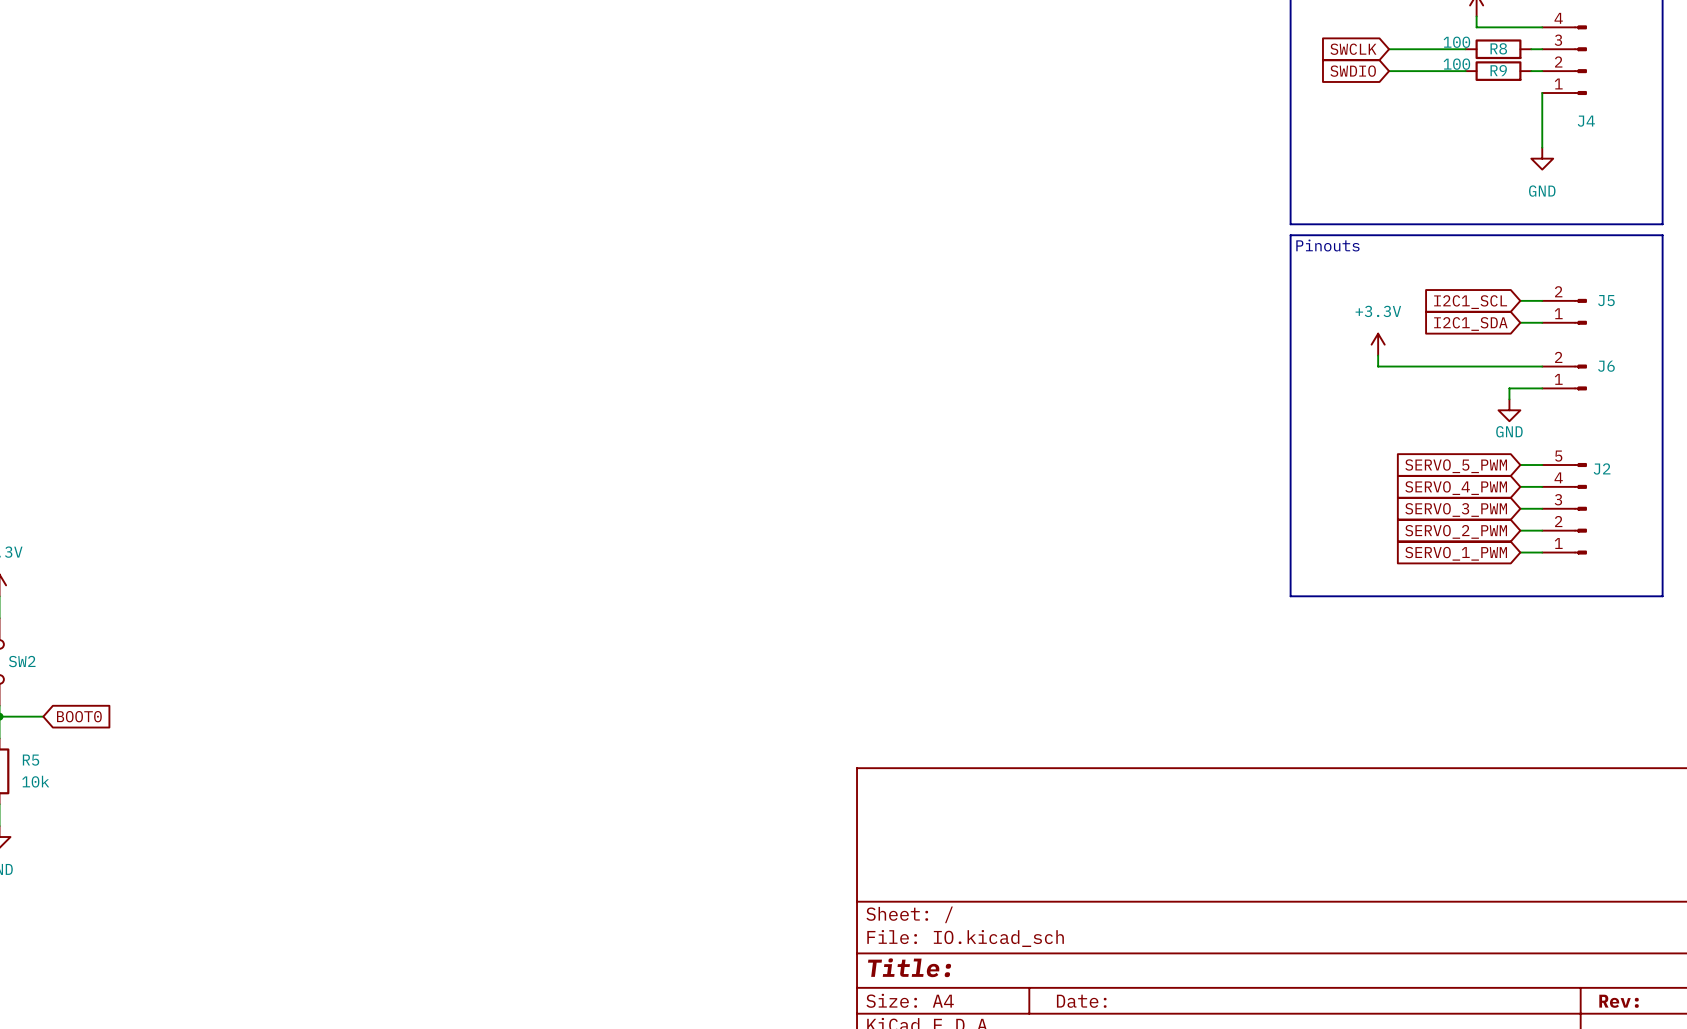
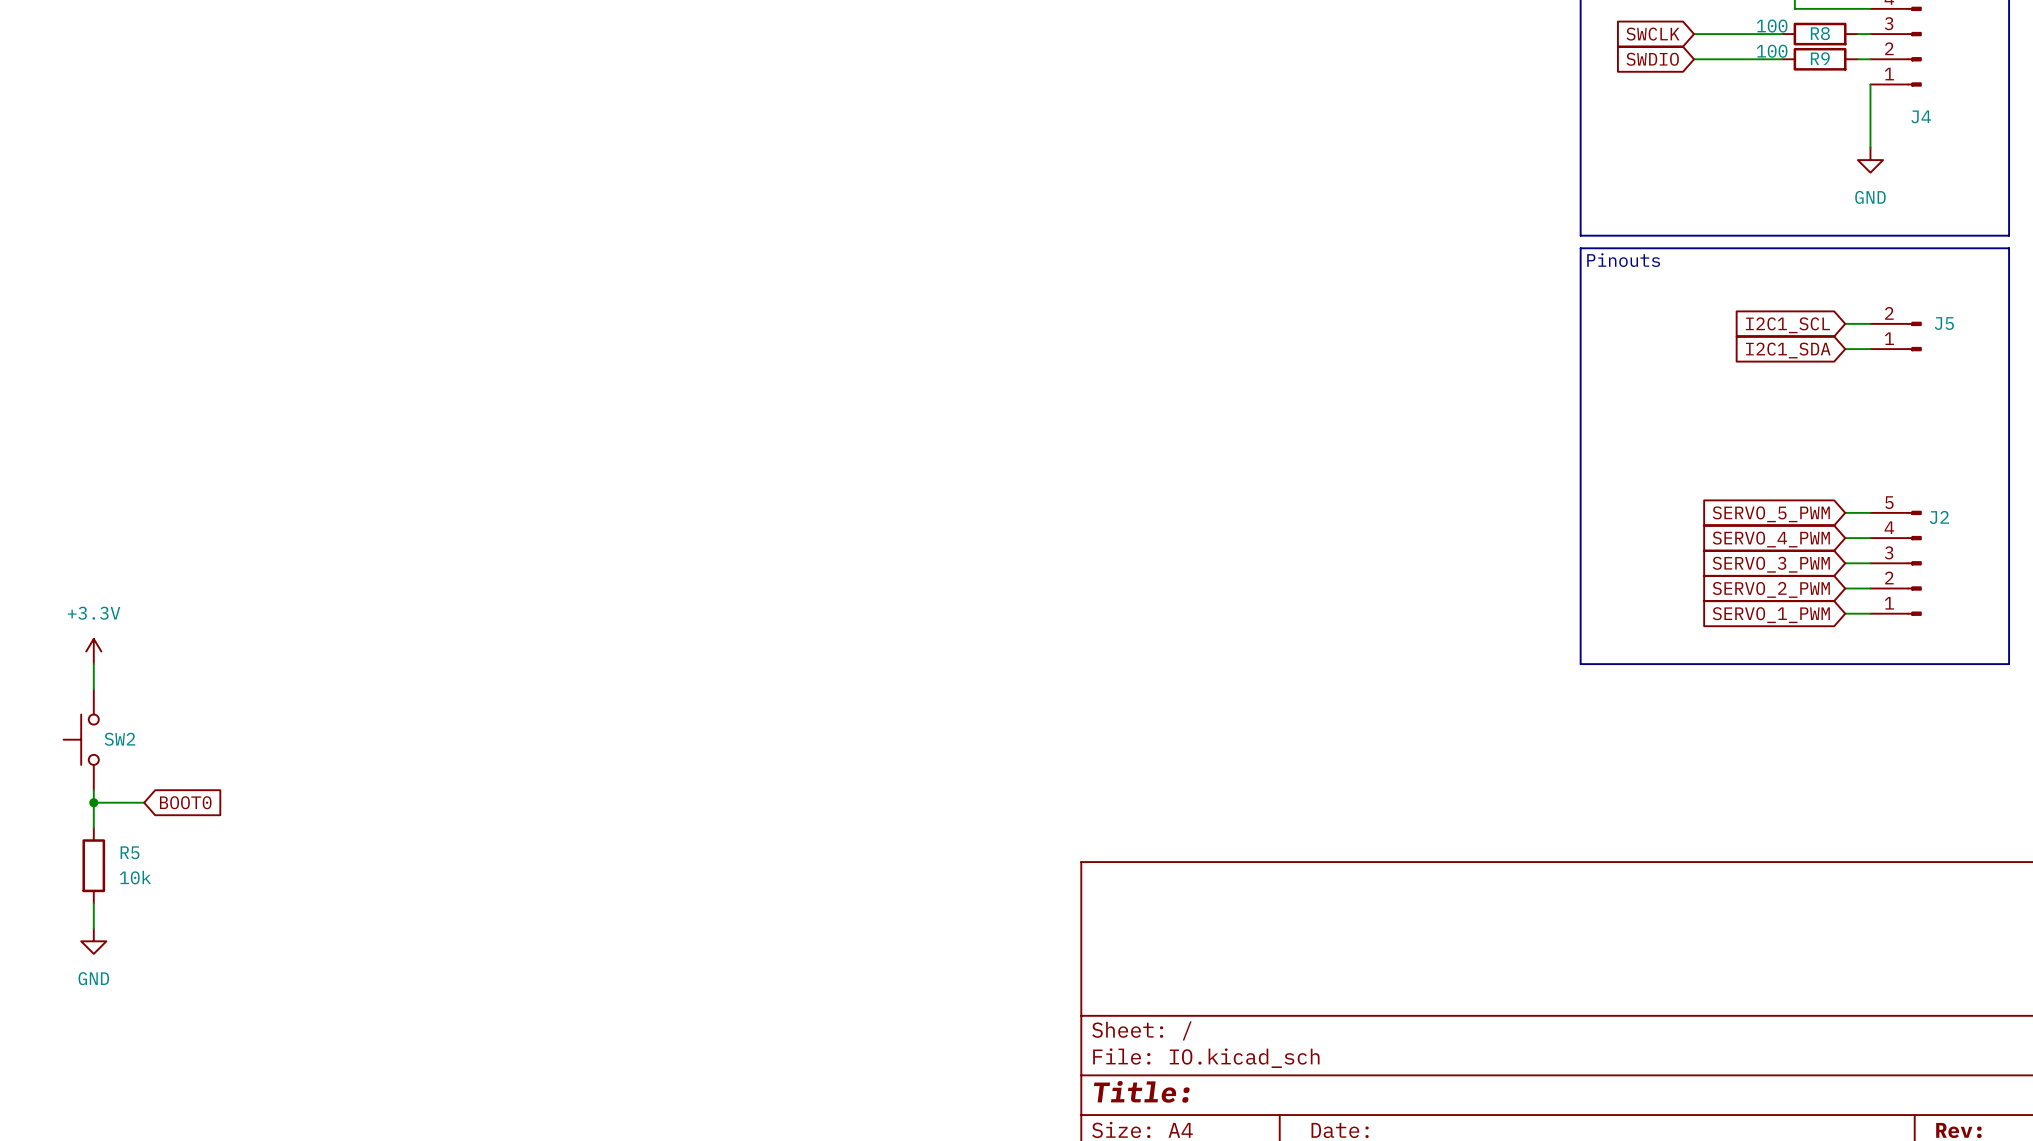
power symbol: +3.3V (1378, 344) -> none
wire: (1378, 355) (1378, 366) (1542, 366) -> none
J6: (1564, 377) -> none
wire: (1542, 388) (1509, 388) (1509, 399) -> none
power symbol: GND (1509, 410) -> none

